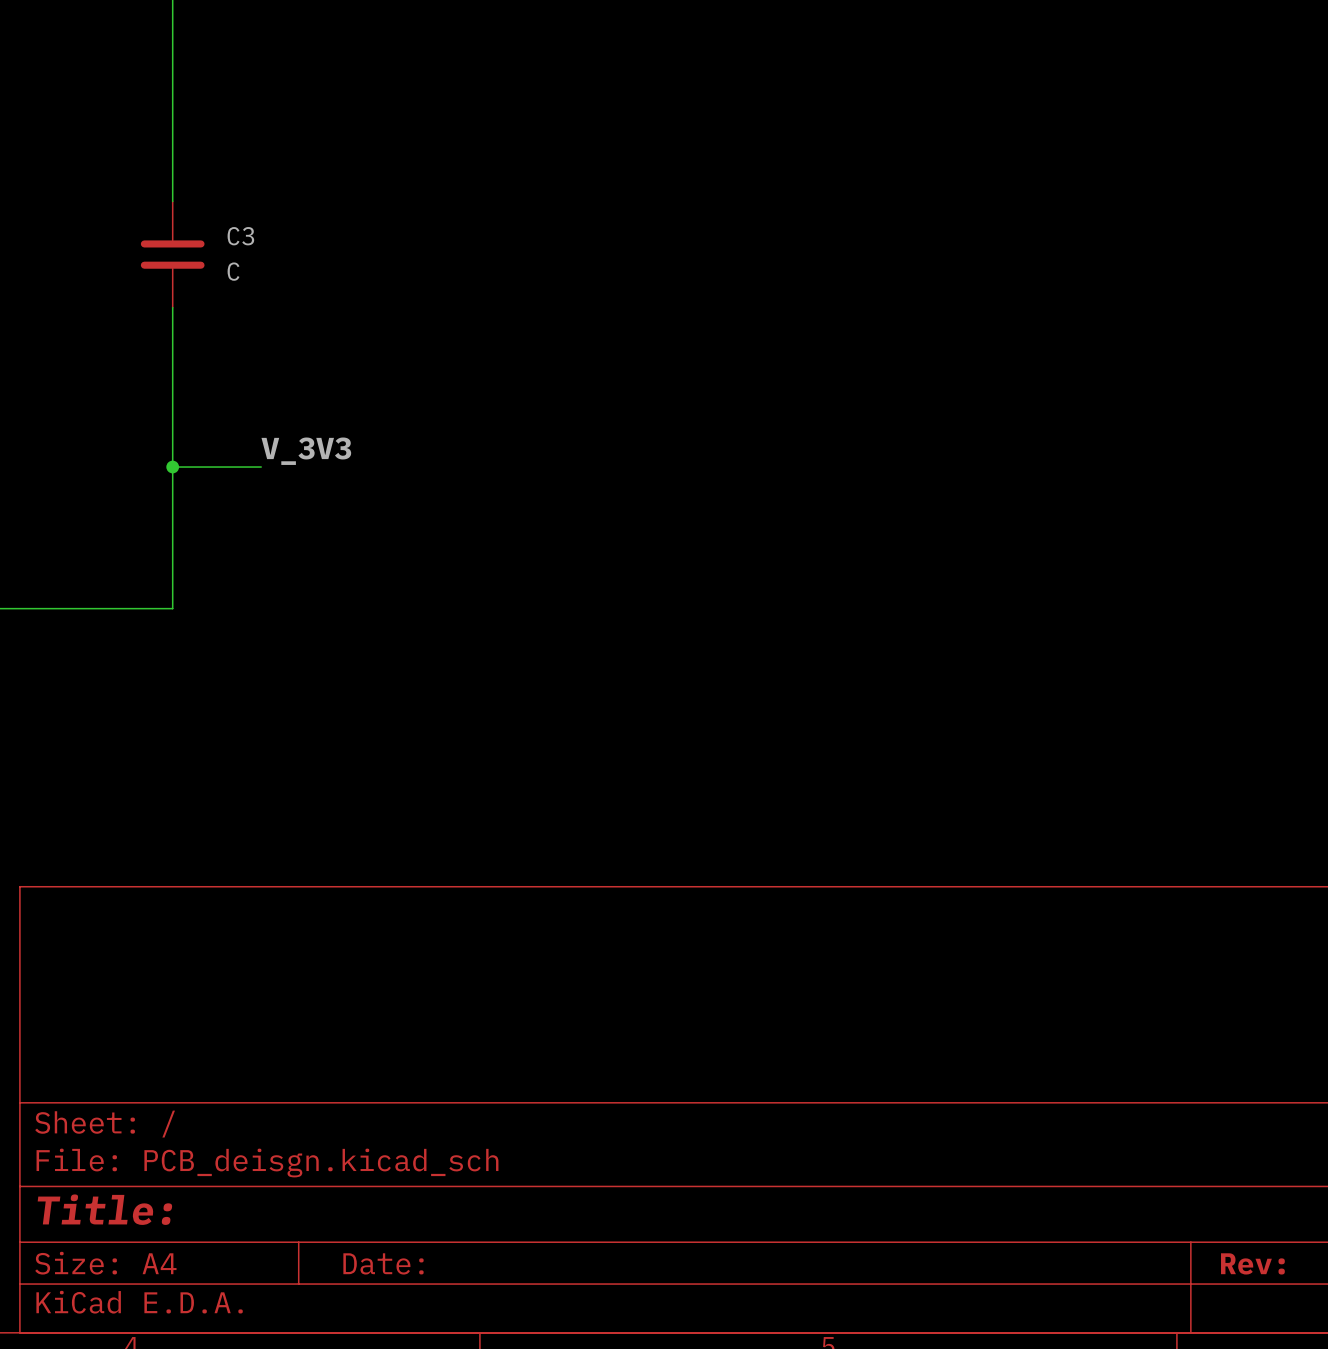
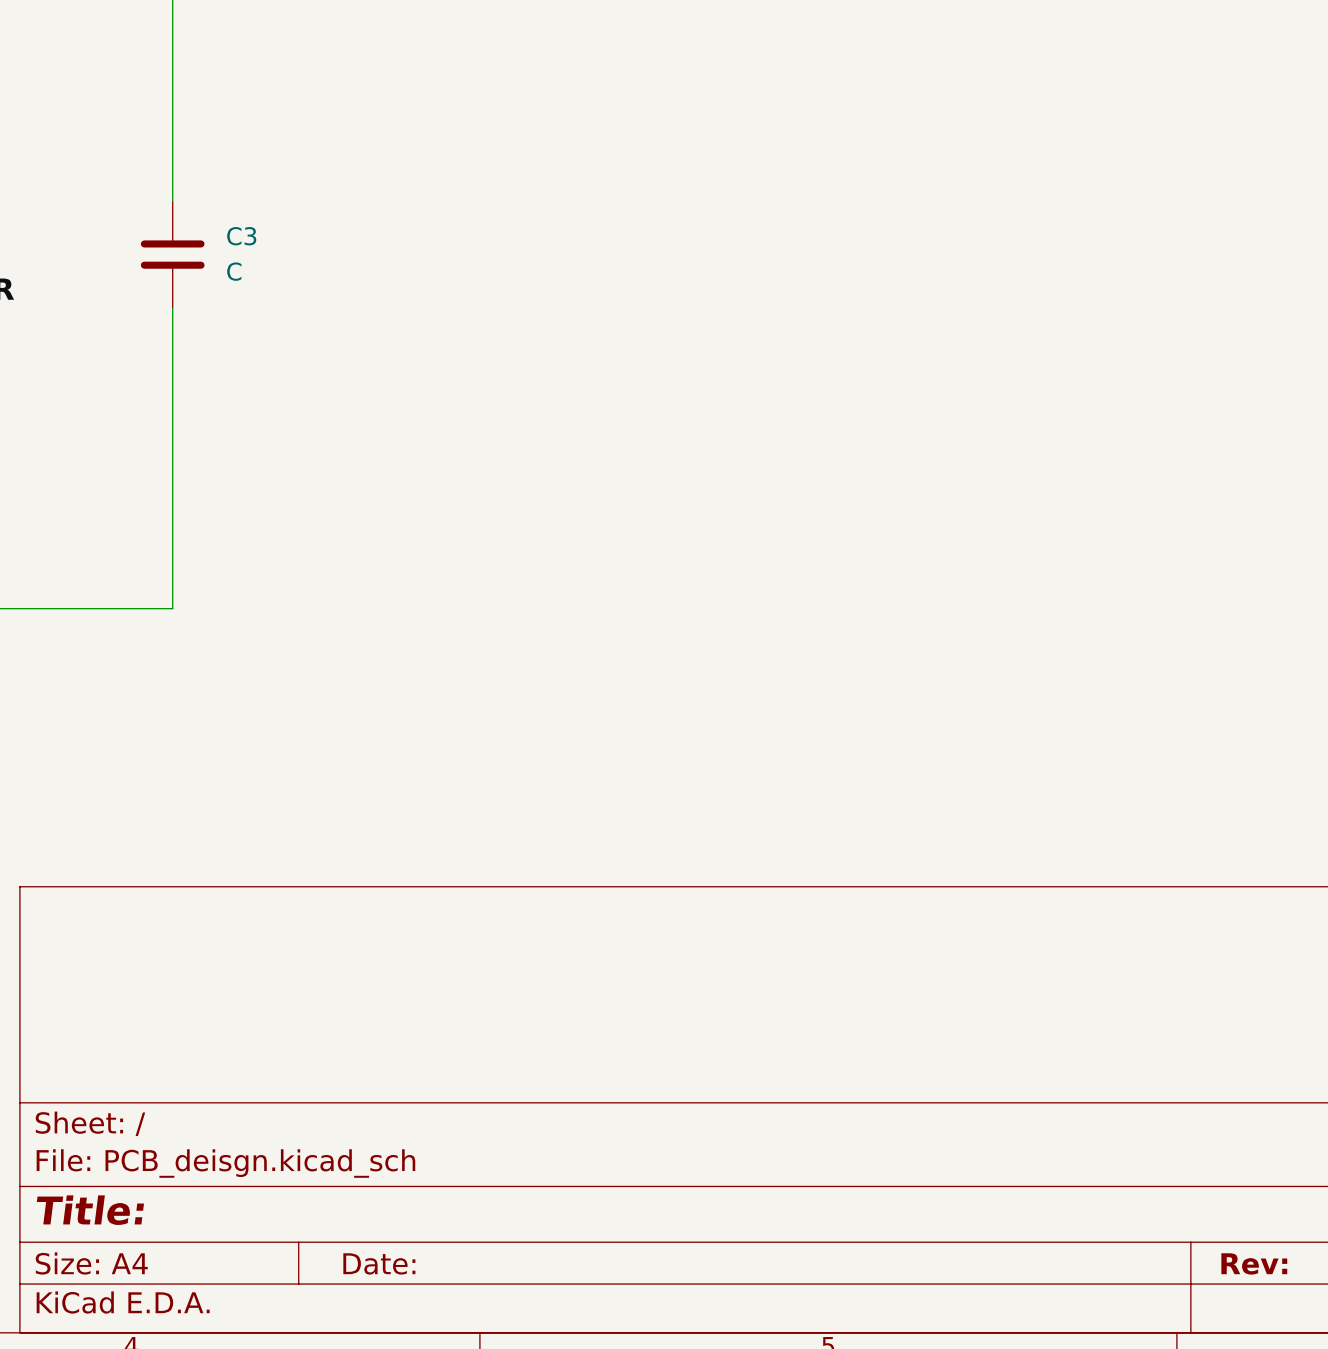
label: V_3V3 (306, 451) -> none
wire: (172, 467) (261, 467) -> none
junction: (172, 467) -> none

